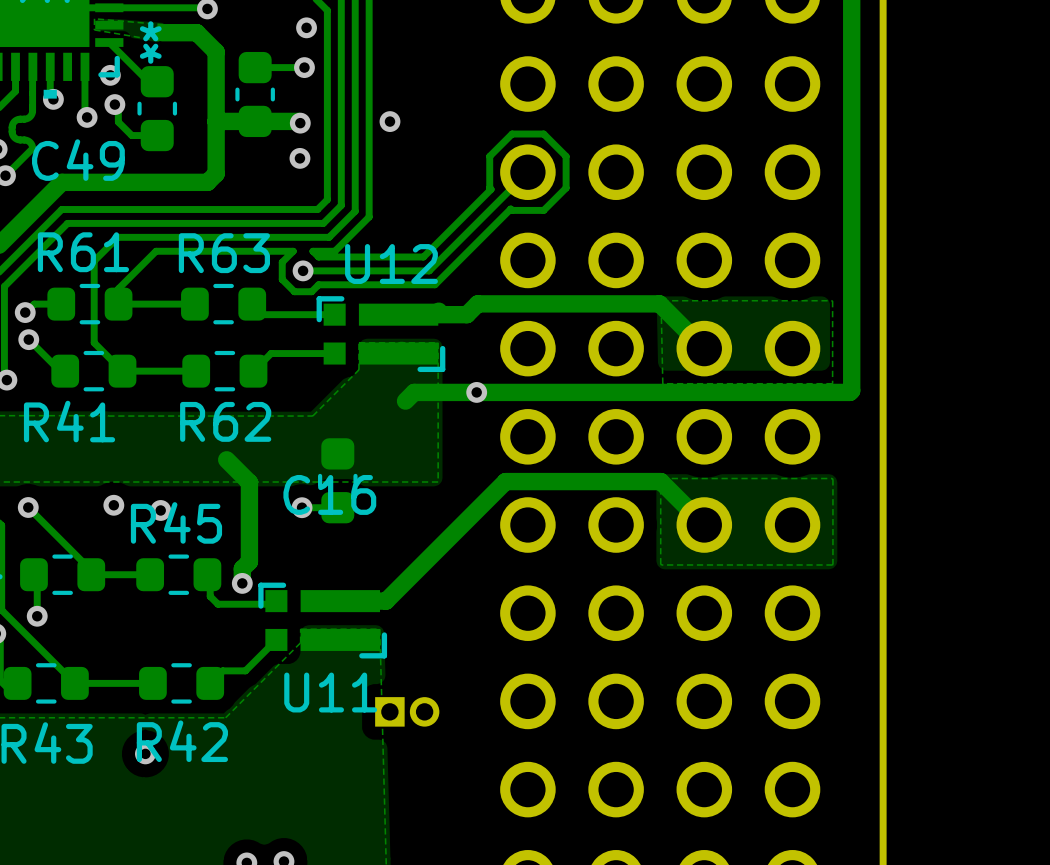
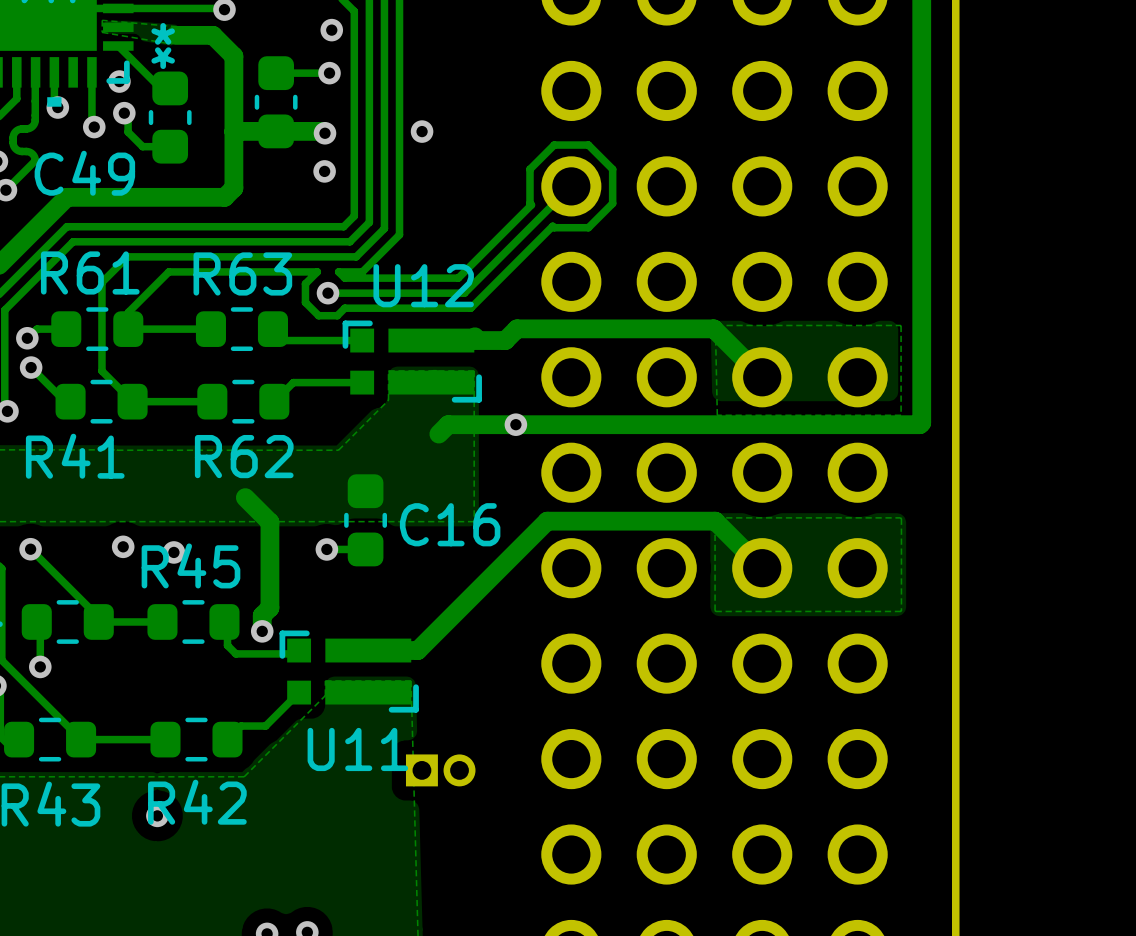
C16 name position: C16 (329, 494) -> C16 (450, 524)

